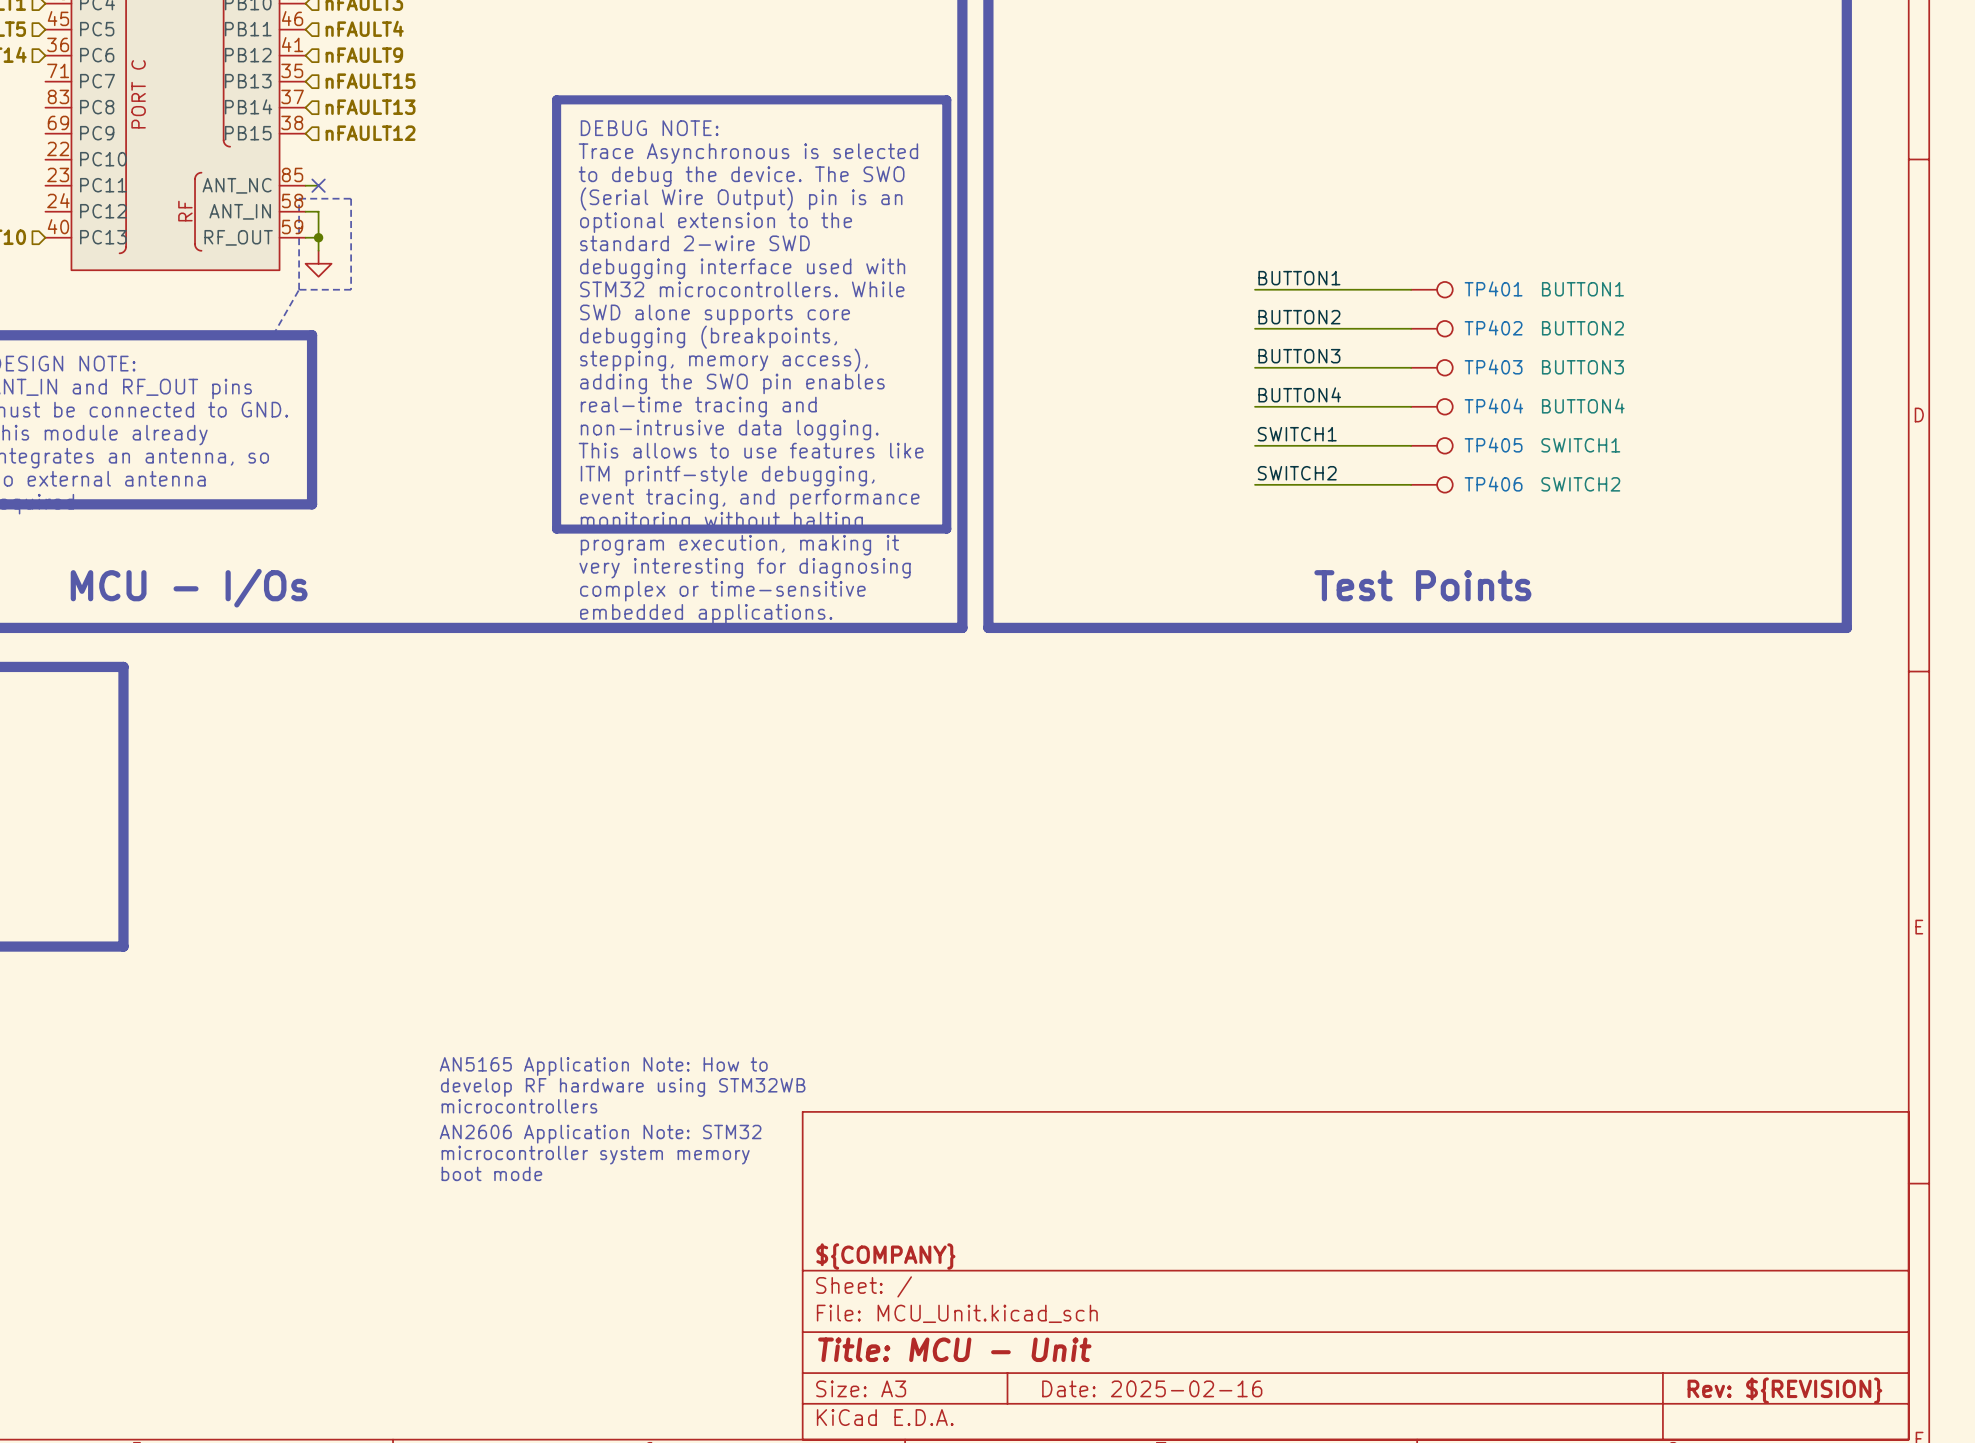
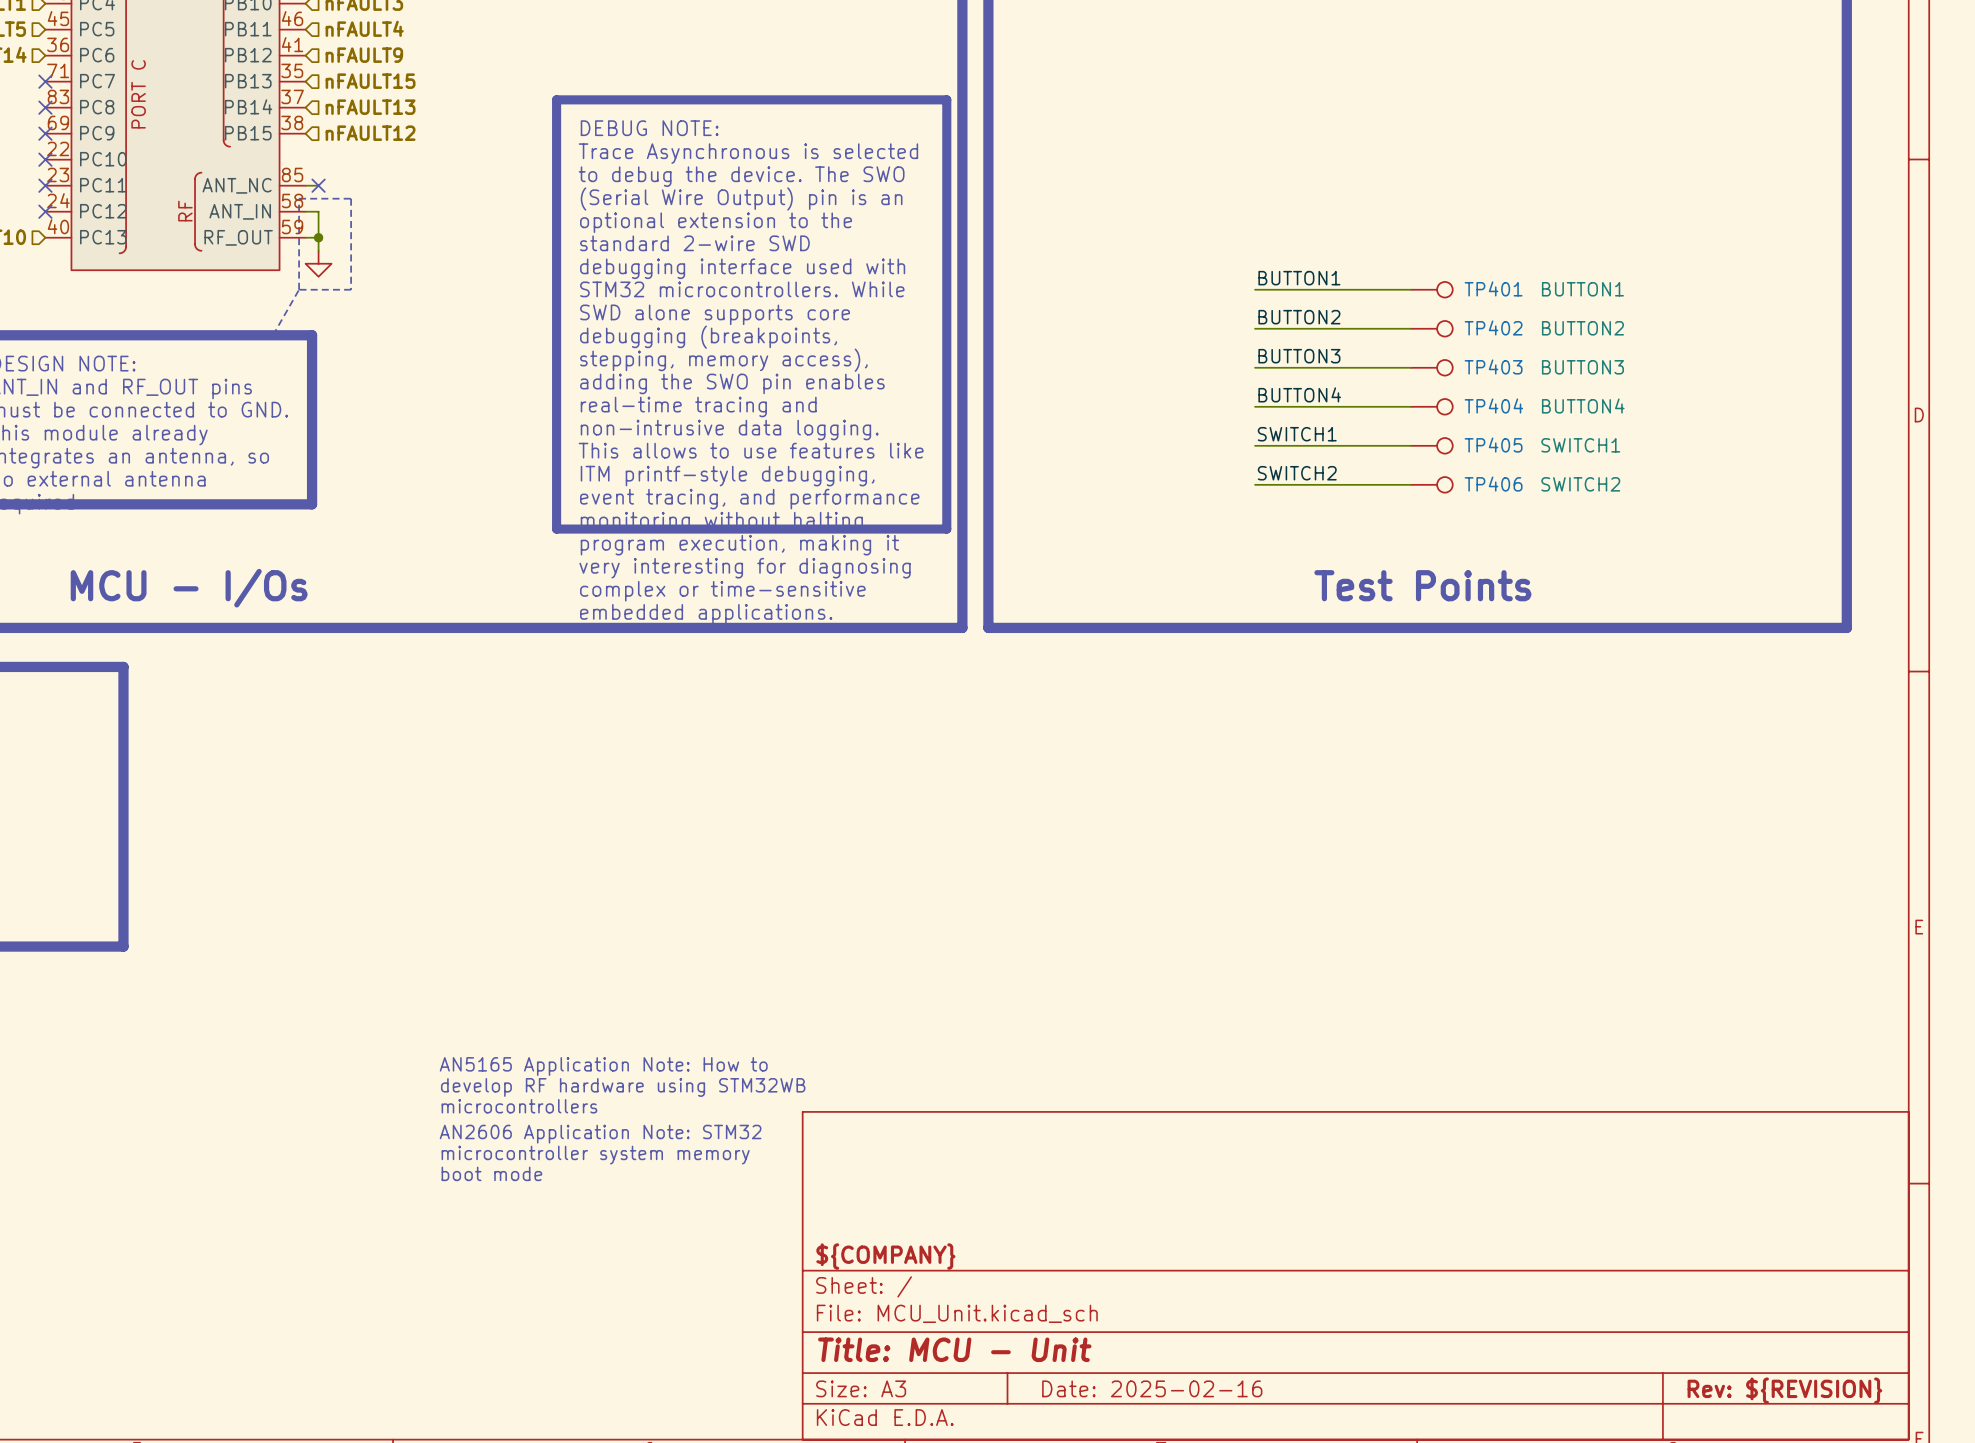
no-connect mark: none -> (45, 81)
no-connect mark: none -> (45, 107)
no-connect mark: none -> (45, 133)
no-connect mark: none -> (45, 159)
no-connect mark: none -> (45, 185)
no-connect mark: none -> (45, 211)

